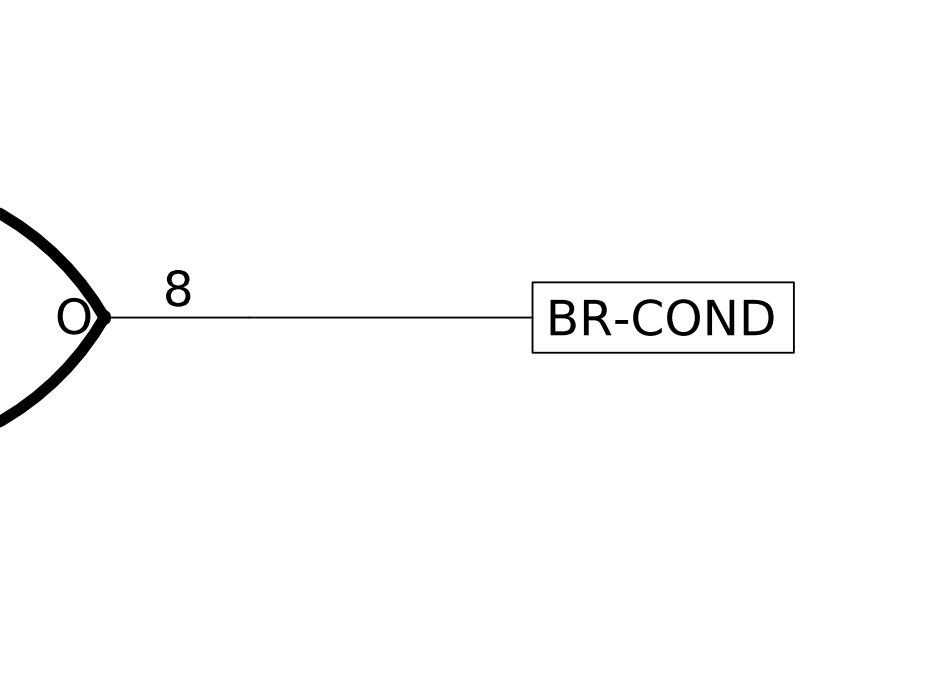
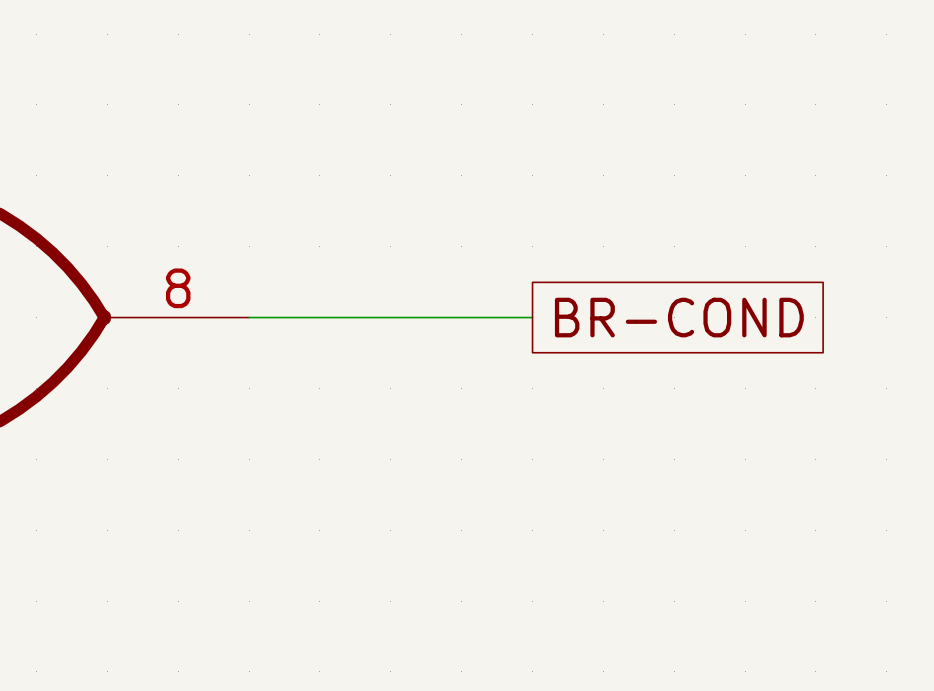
part pin name: O (74, 316) -> none

